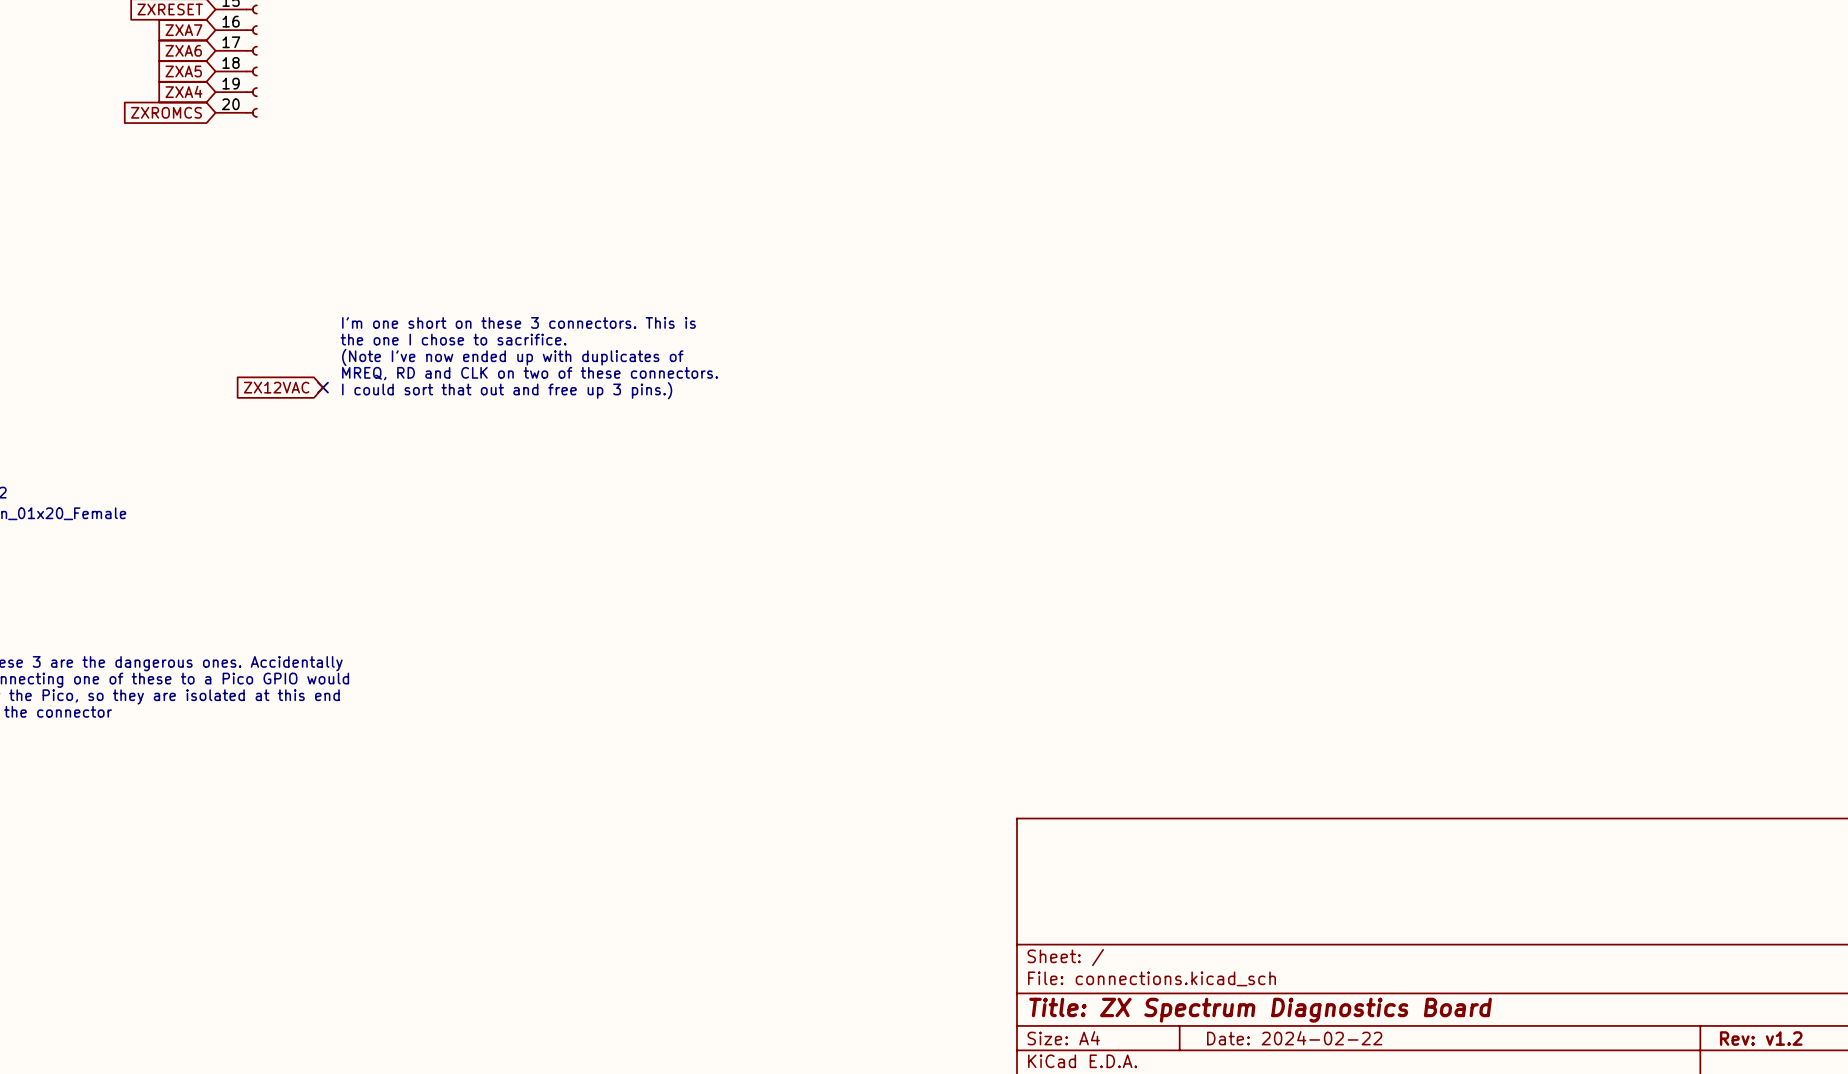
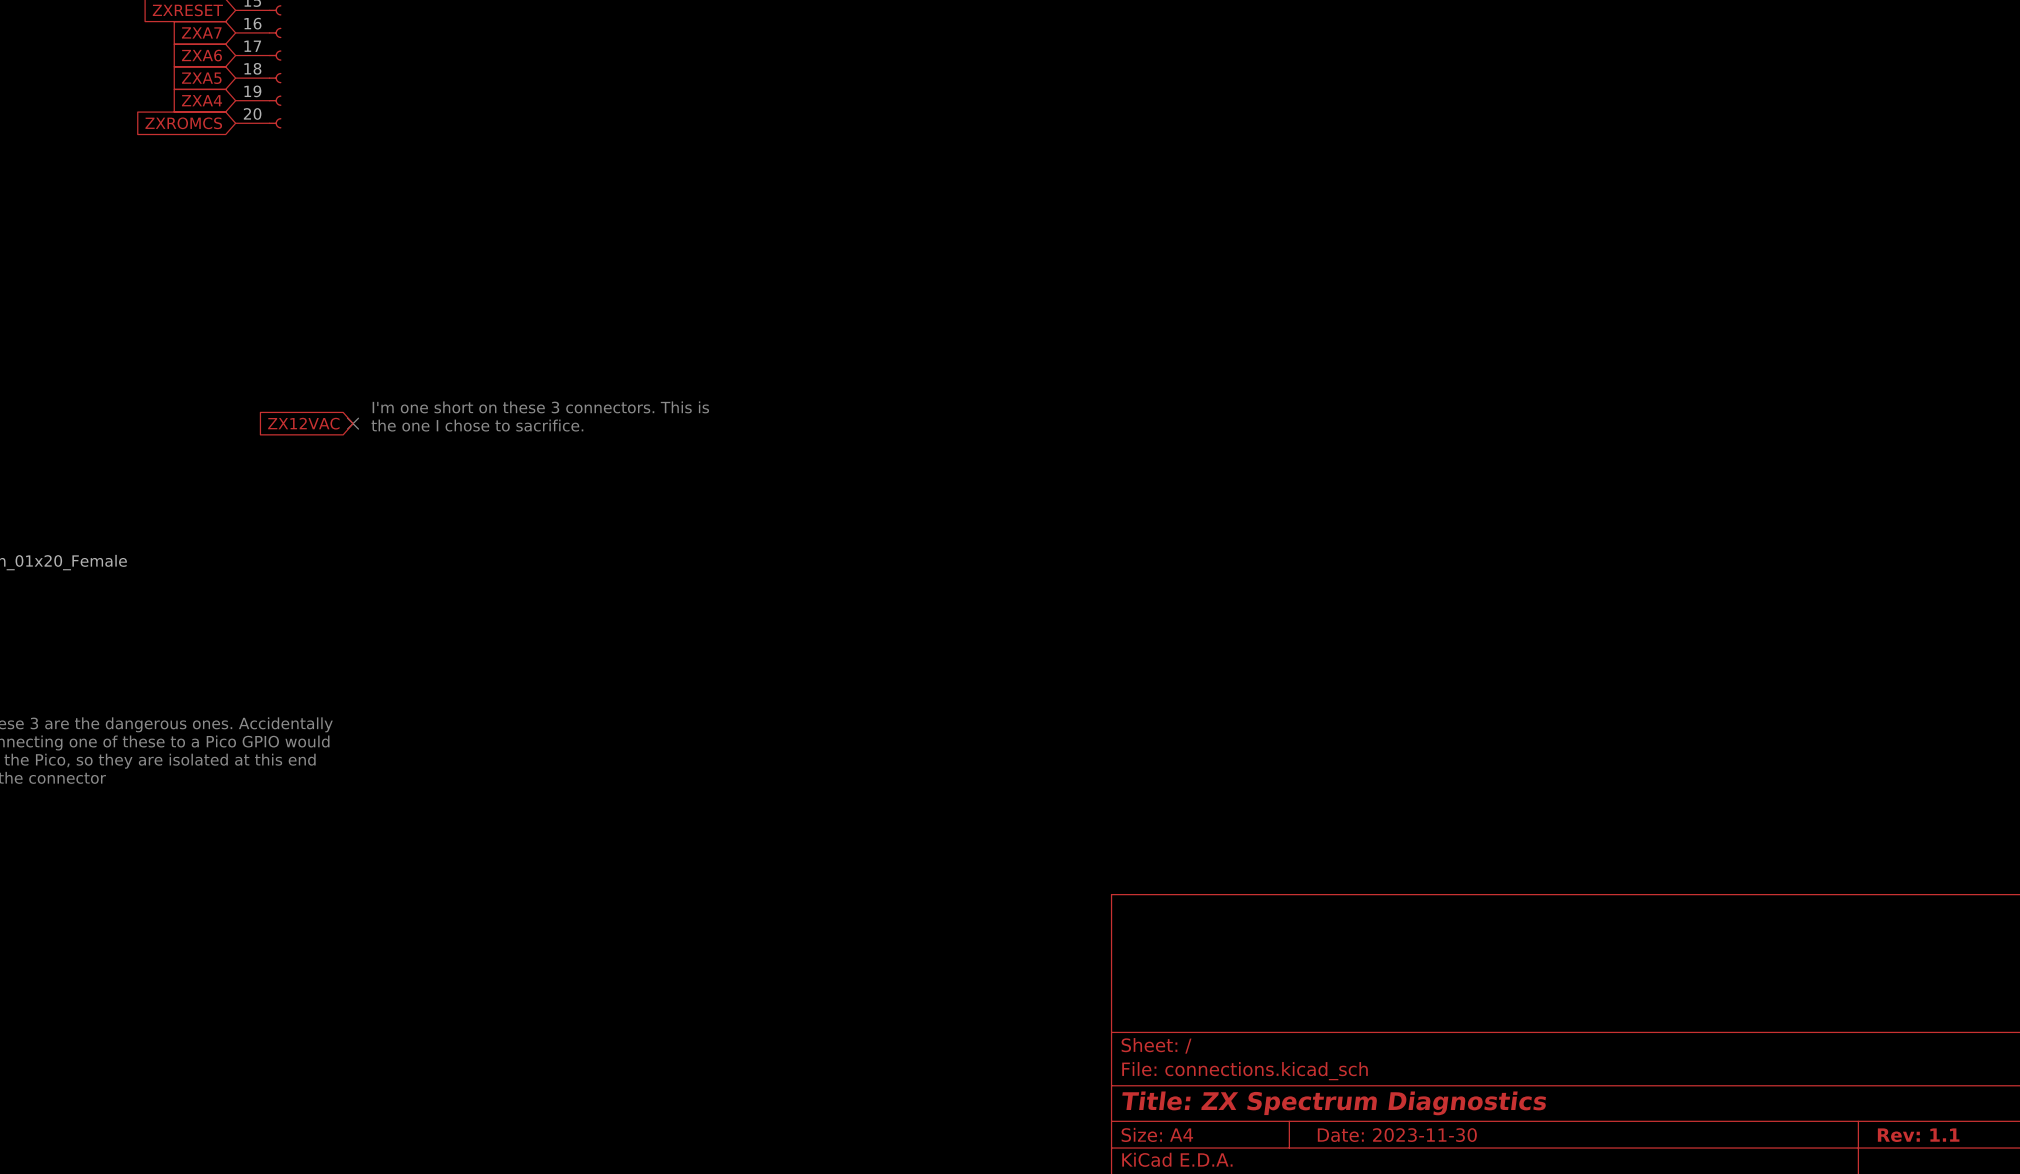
text: I'm one short on these 3 connectors. This is (518, 322) -> none
text: the one I chose to sacrifice. (453, 339) -> none
text: (Note I've now ended up with duplicates of (512, 357) -> none
text: MREQ, RD and CLK on two of these connectors. (530, 373) -> I'm one short on these 3 connectors. This is (540, 407)
text: I could sort that out and free up 3 pins.) (507, 390) -> the one I chose to sacrifice. (477, 425)
title block: Title: ZX Spectrum Diagnostics Board (1260, 1010) -> Title: ZX Spectrum Diagnostics (1334, 1103)
title block: Date: 2024-02-22 (1294, 1038) -> Date: 2023-11-30 (1397, 1135)
title block: Rev: v1.2 (1761, 1038) -> Rev: 1.1 (1918, 1135)

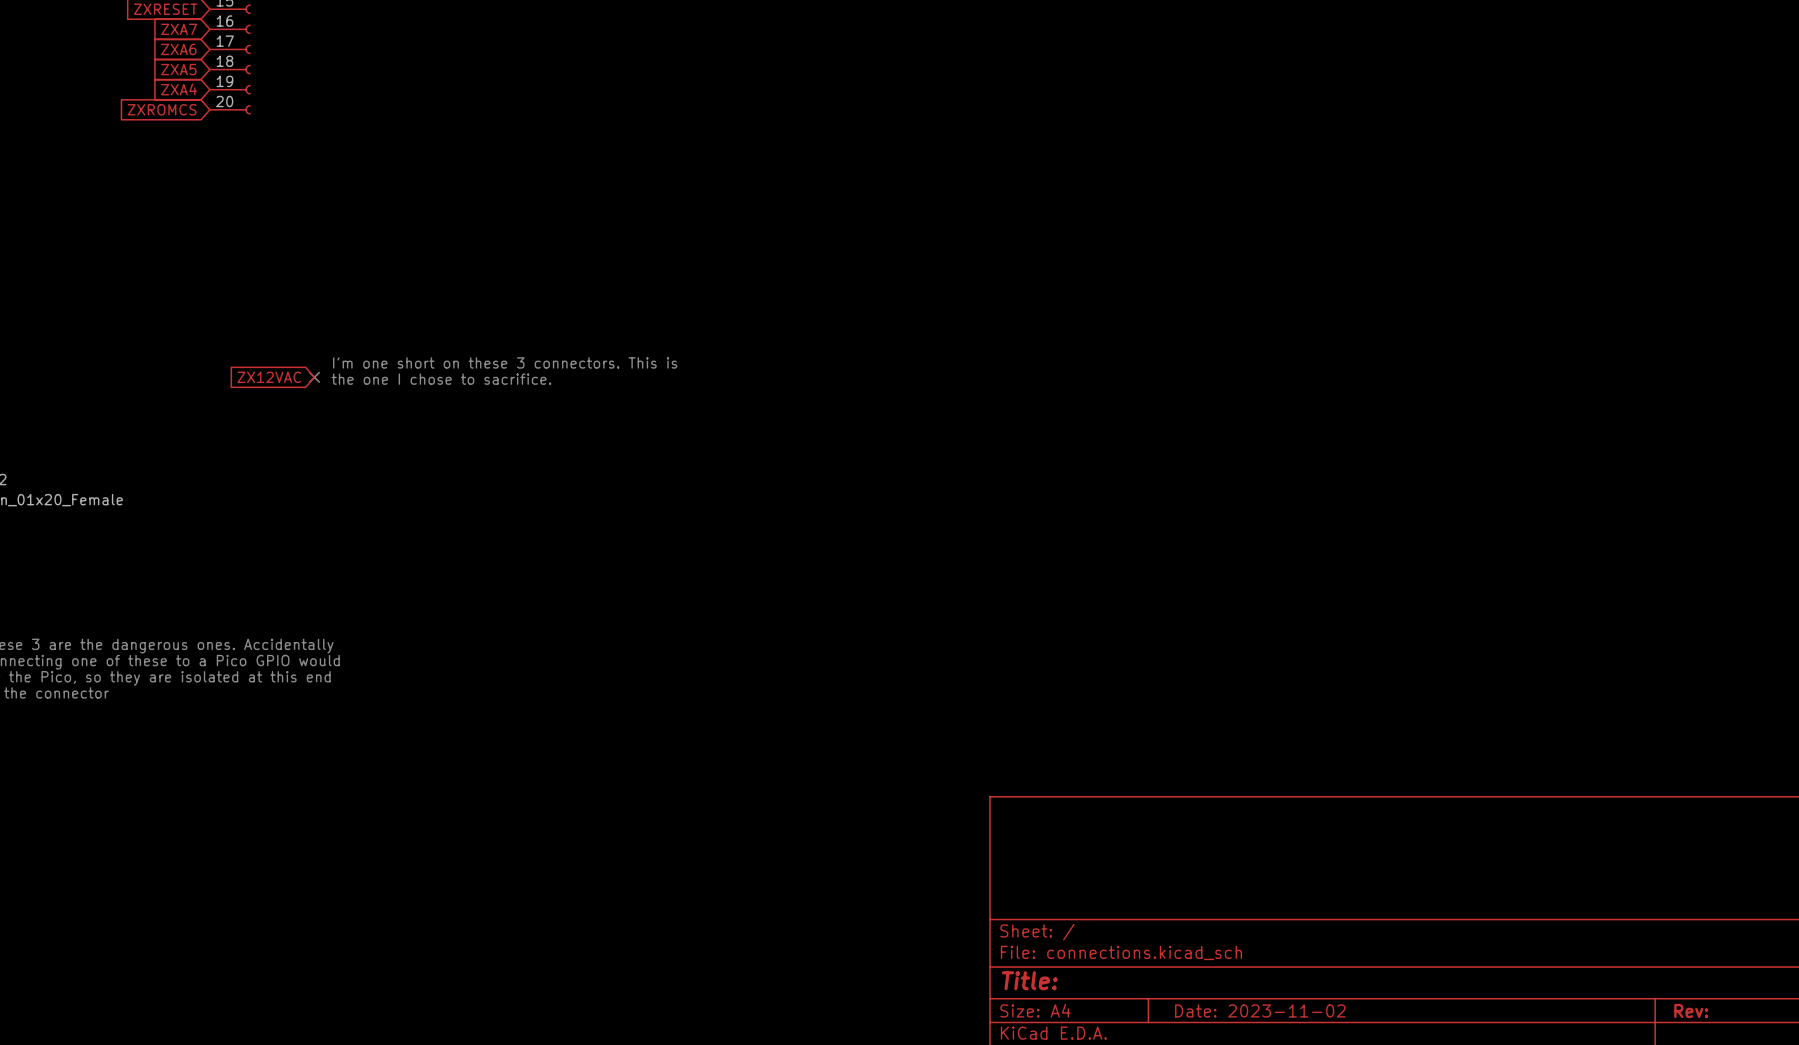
title block: Title: ZX Spectrum Diagnostics (1334, 1103) -> Title: (1029, 980)
title block: Date: 2023-11-30 (1397, 1135) -> Date: 2023-11-02 (1260, 1010)
title block: Rev: 1.1 (1918, 1135) -> Rev: (1691, 1010)

